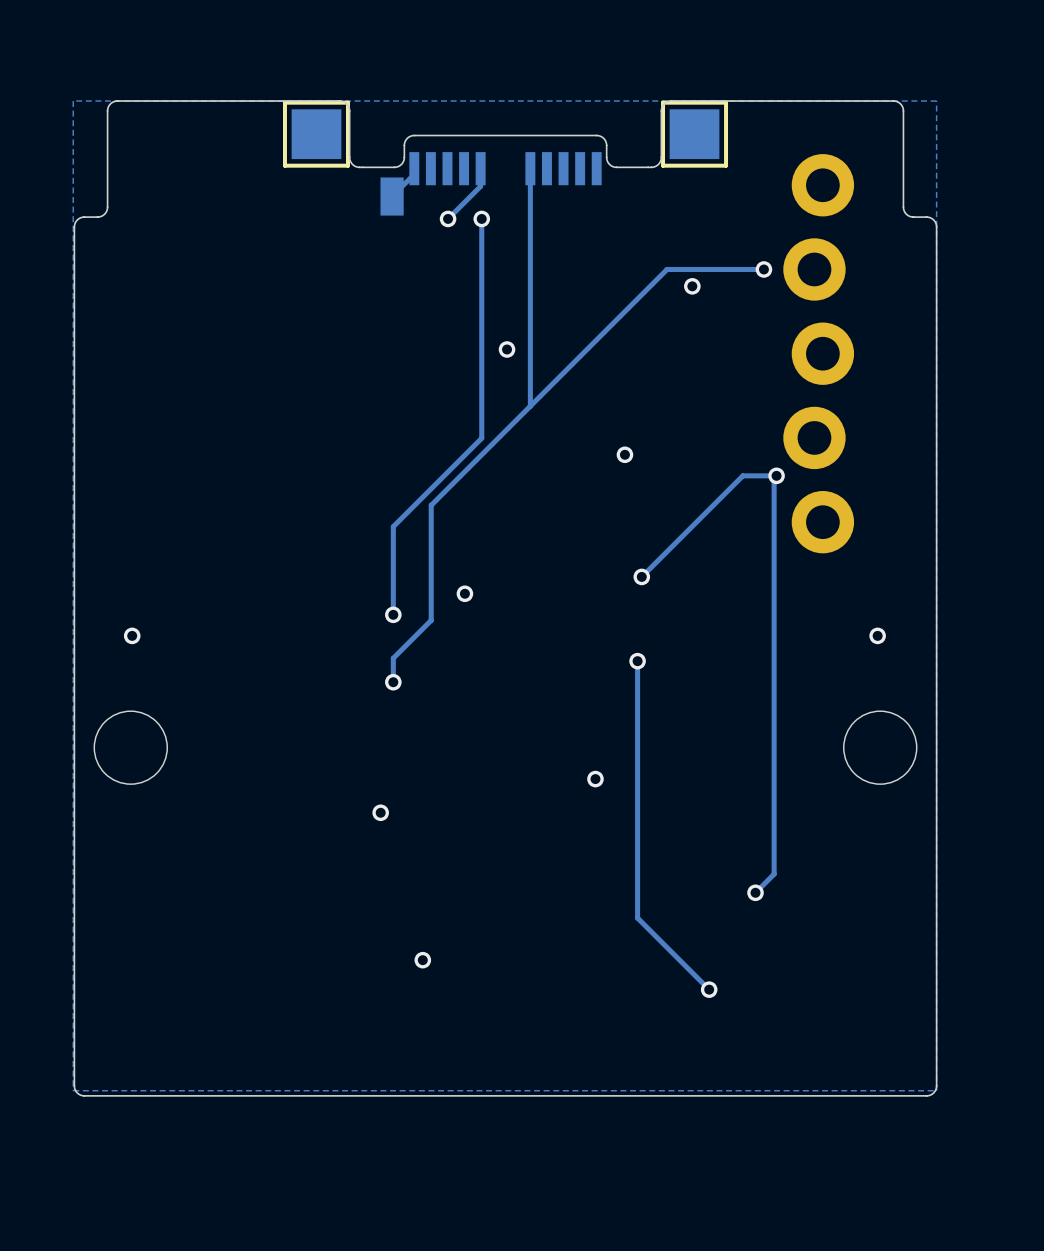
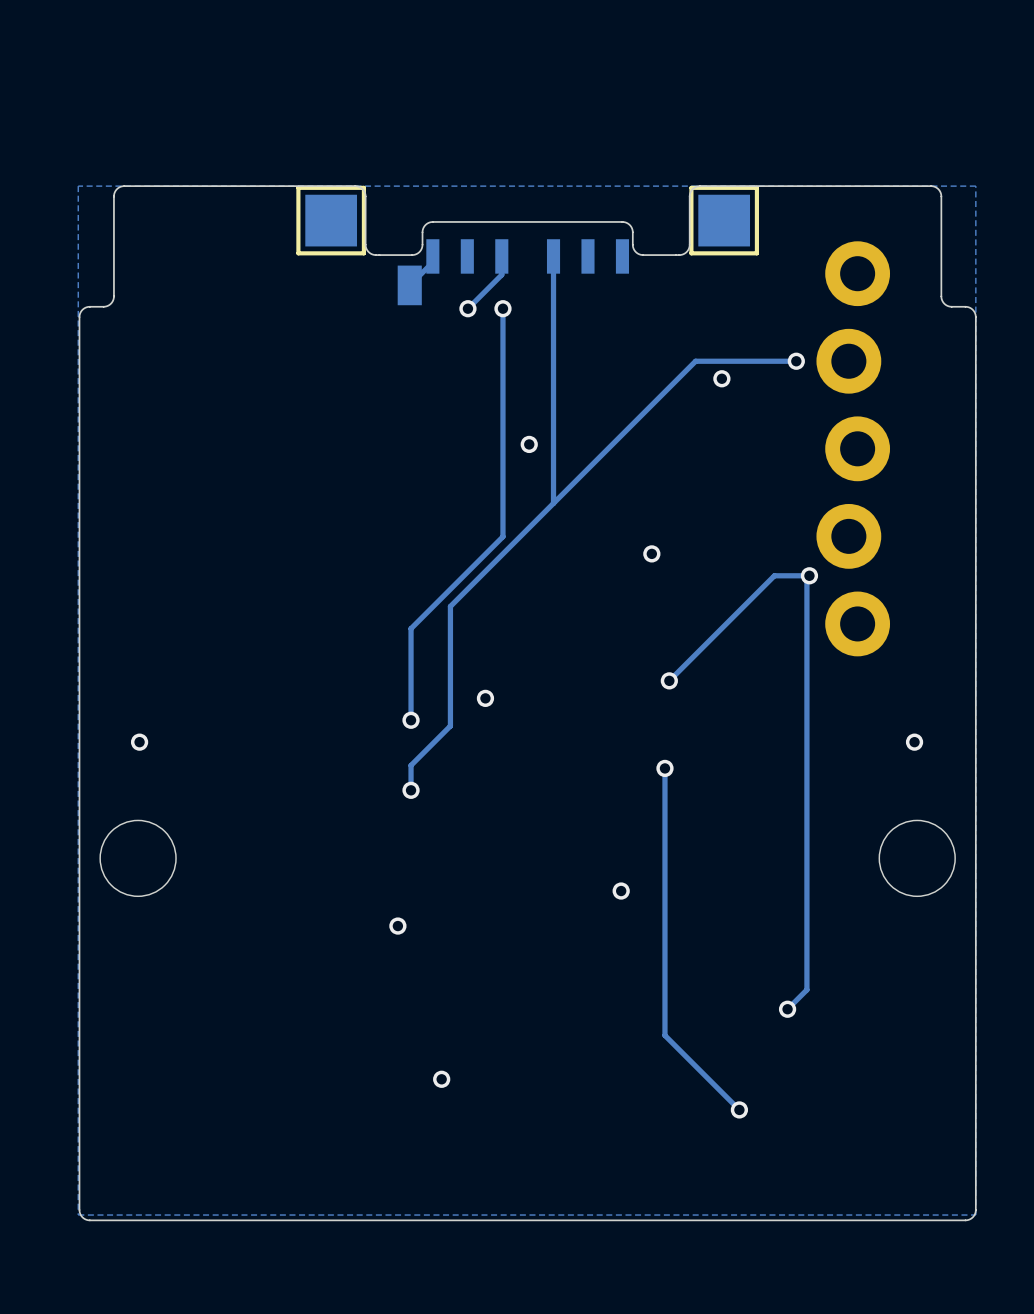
part footprint: [362, 134, 649, 216] -> [378, 221, 677, 306]

